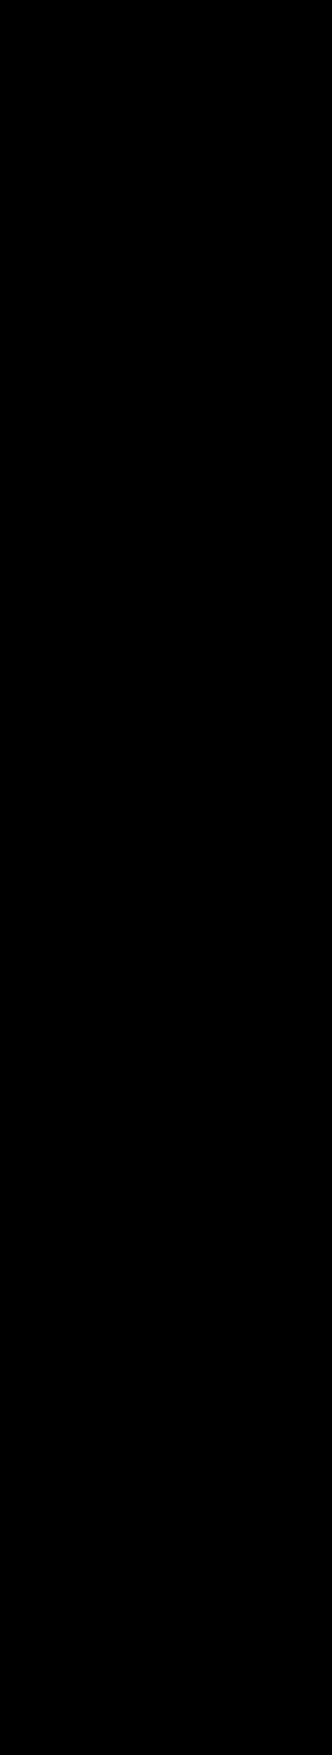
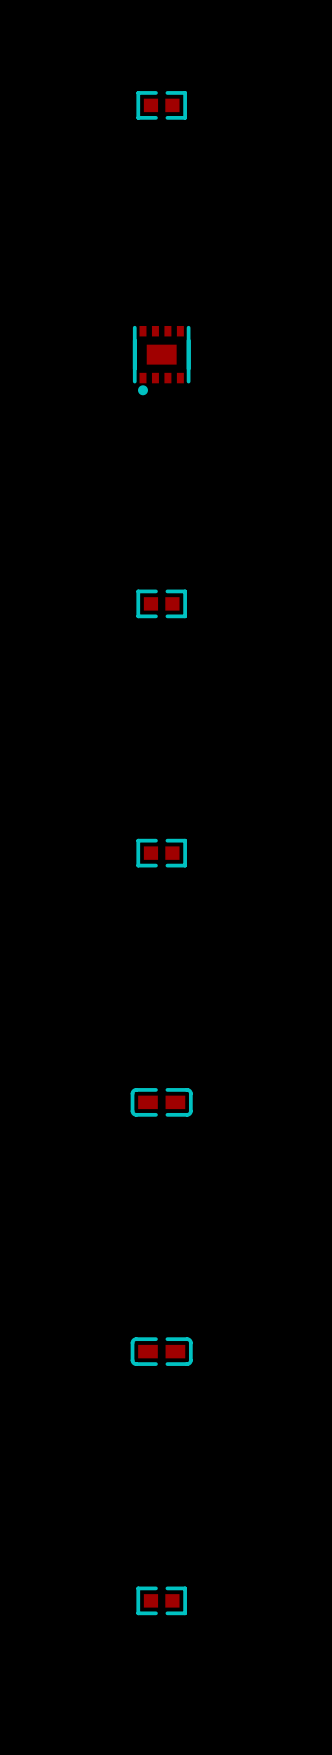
part: none -> (161, 105)
part: none -> (161, 360)
part: none -> (161, 603)
part: none -> (161, 853)
part: none -> (161, 1102)
part: none -> (161, 1351)
part: none -> (161, 1600)

